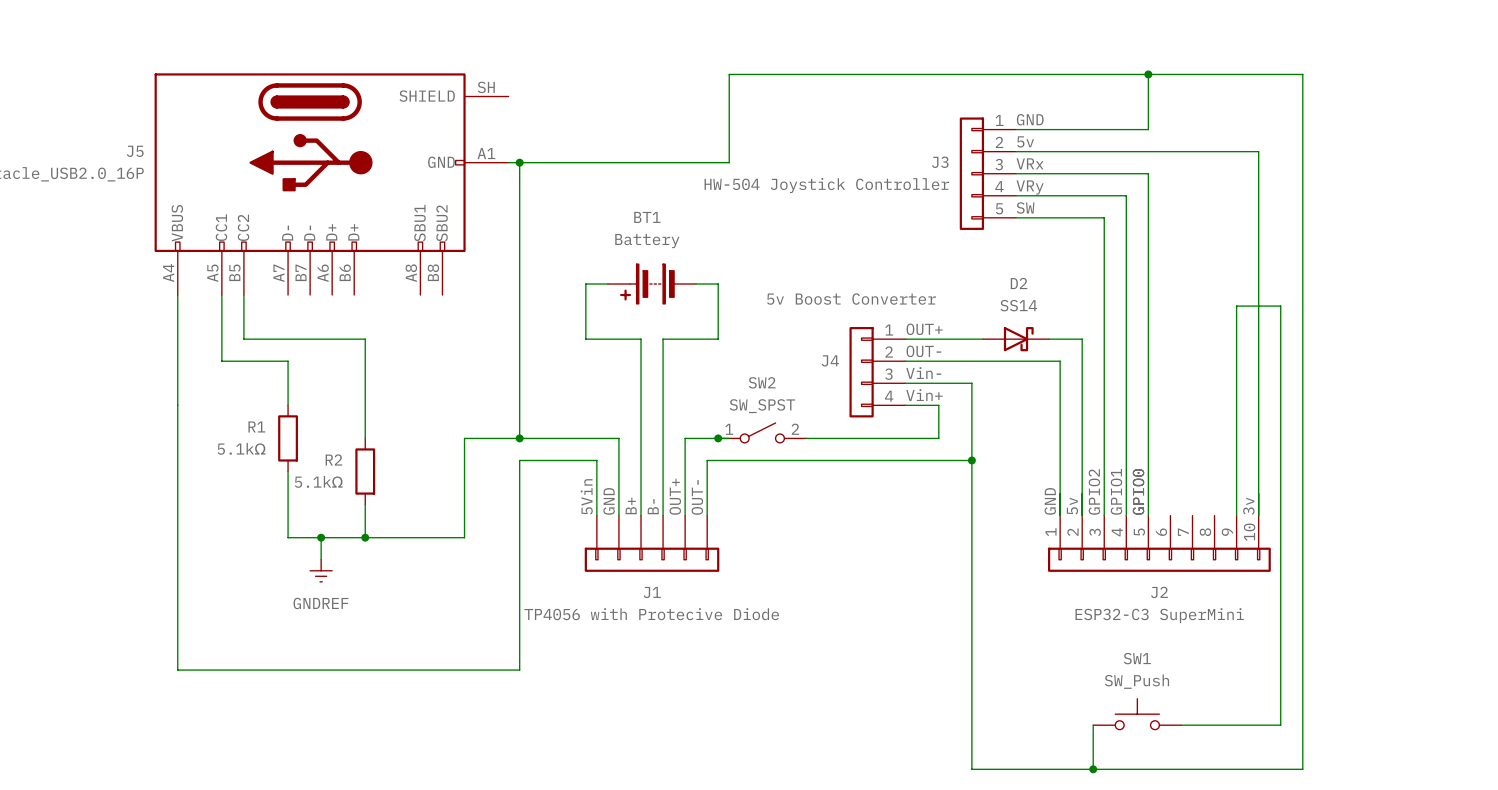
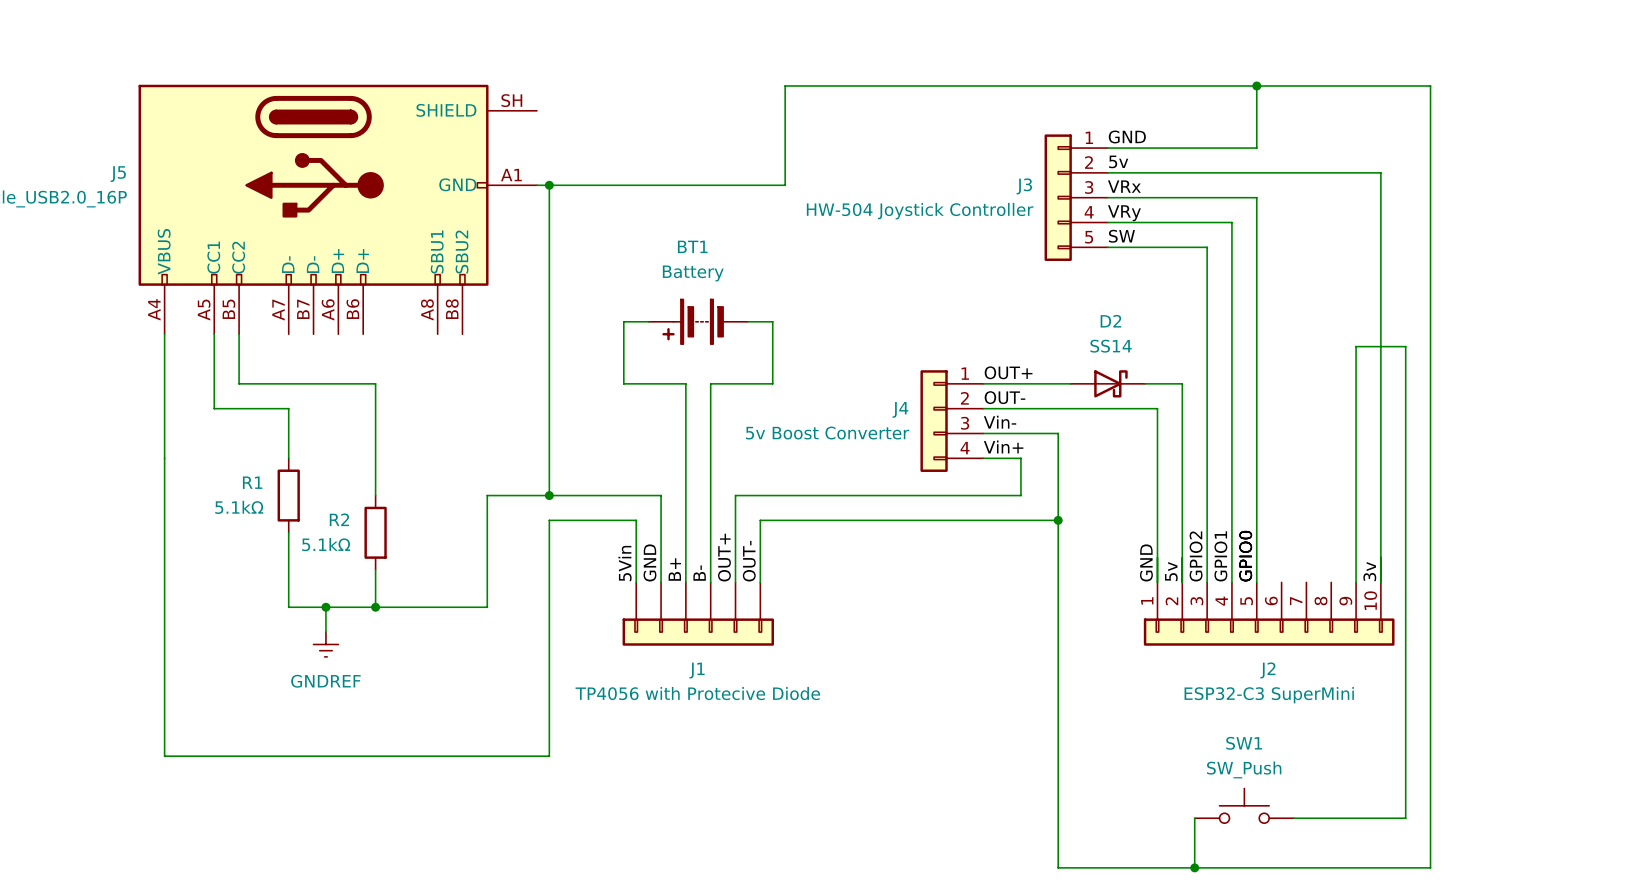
J4 value position: 5v Boost Converter (851, 299) -> 5v Boost Converter (827, 433)
SW2: SW_SPST (762, 432) -> none
junction: (718, 438) -> none
wire: none -> (785, 495) (872, 495)

